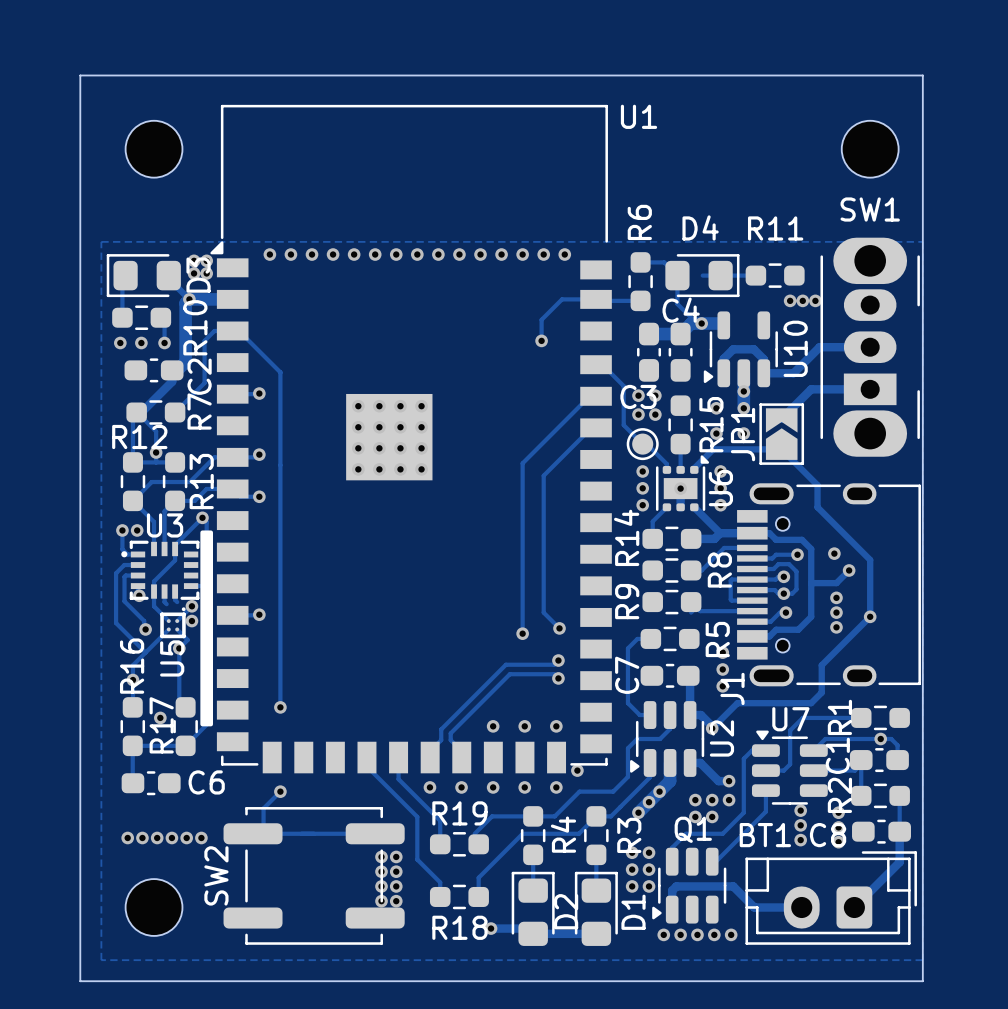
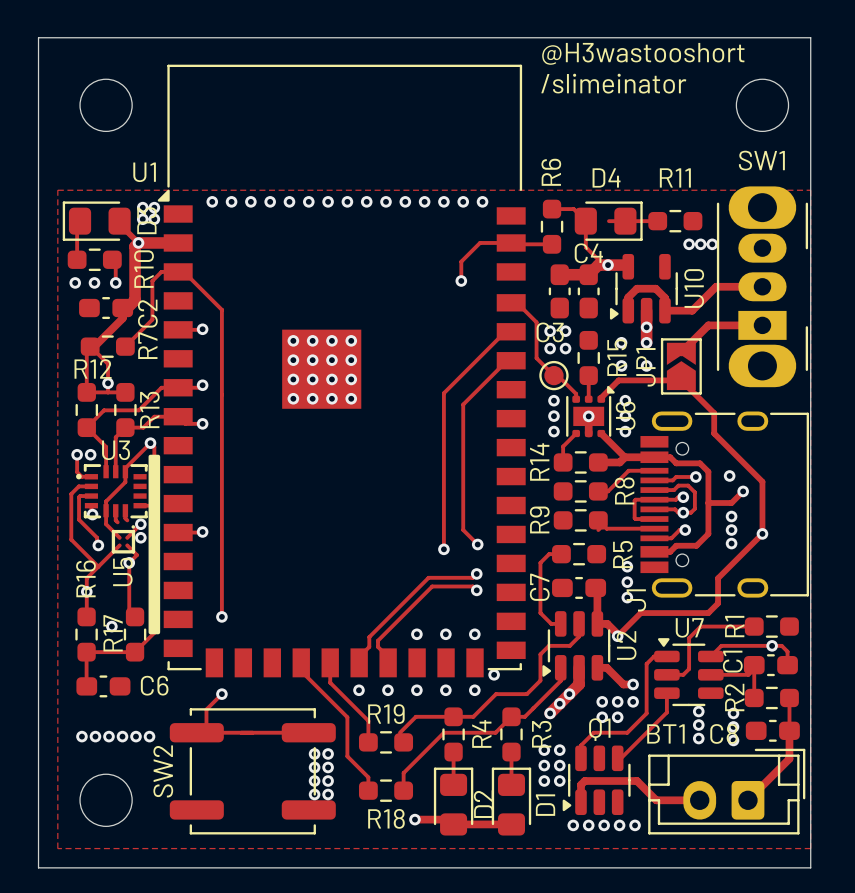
text: none -> @H3wastooshort (643, 53)
U1 name position: U1 (638, 116) -> U1 (144, 172)
text: none -> /slimeinator (613, 83)

